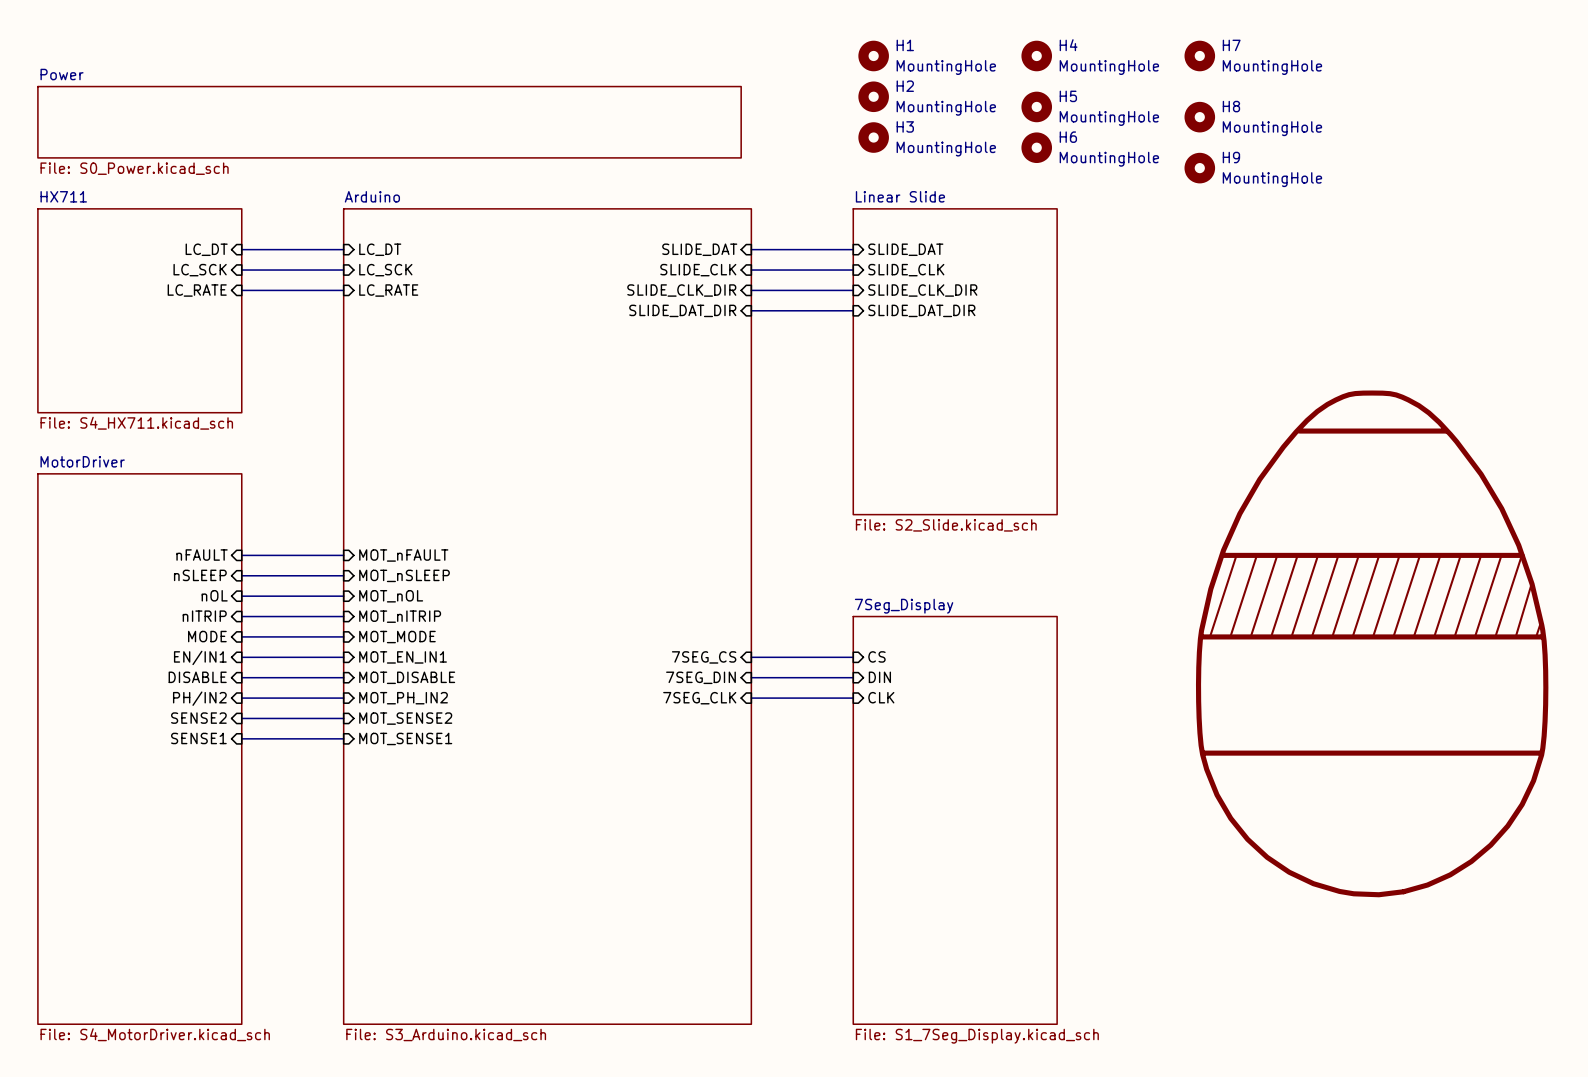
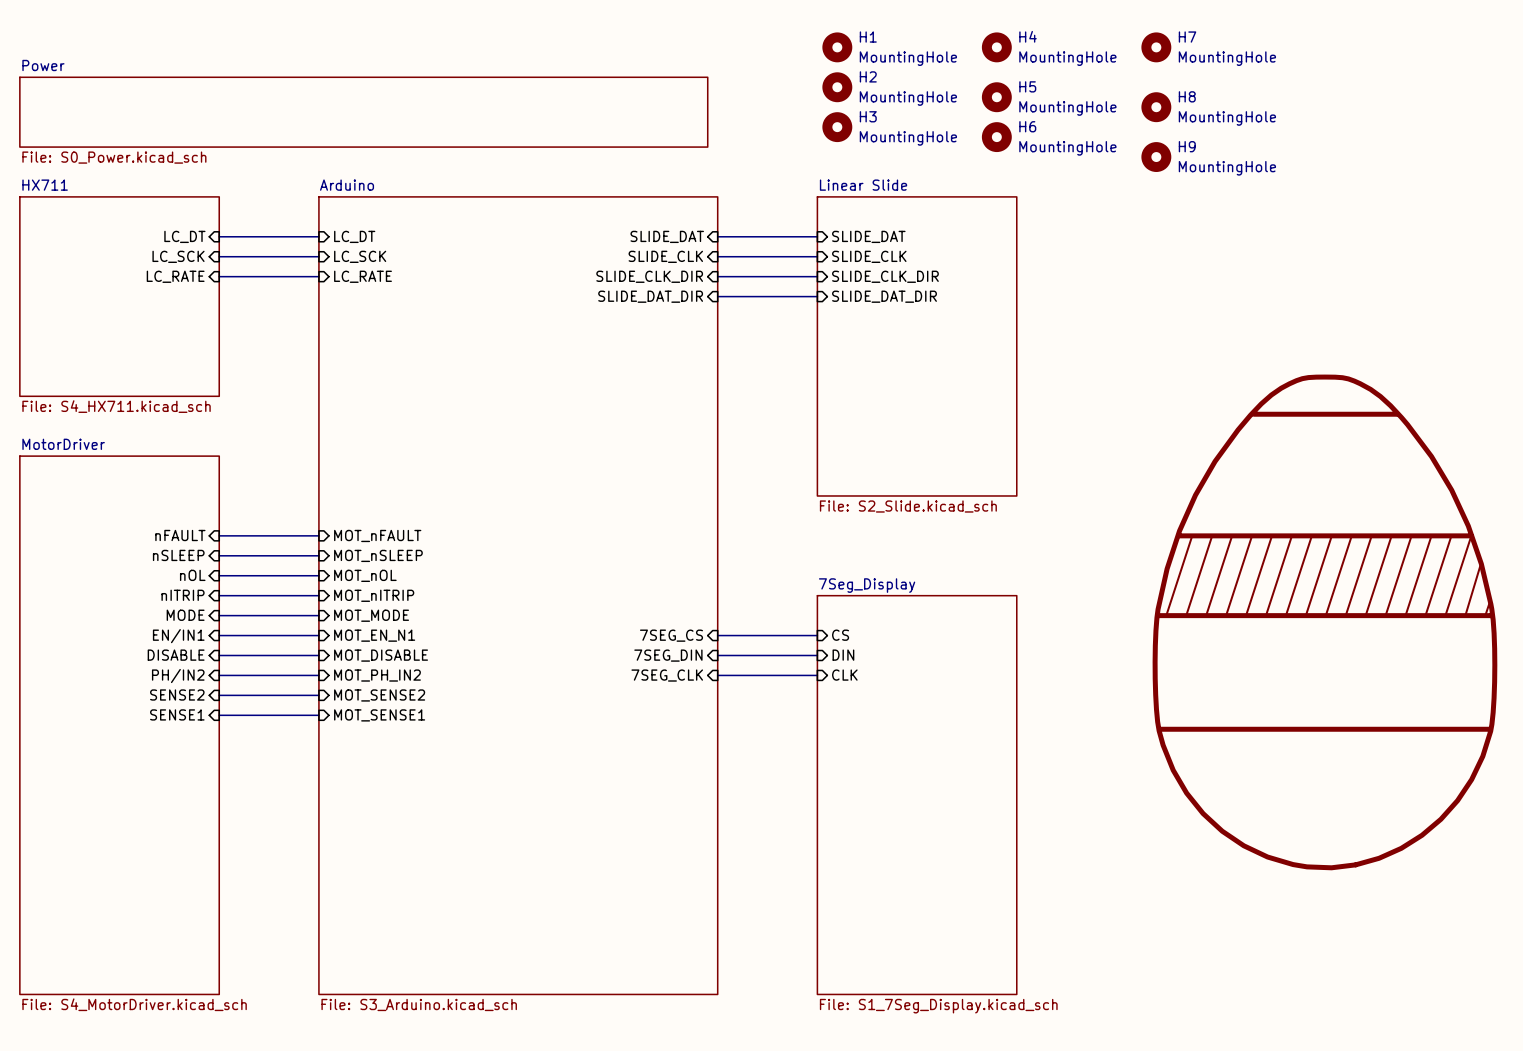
sheet pin: MOT_EN_IN1 (403, 657) -> MOT_EN_N1 (374, 635)

